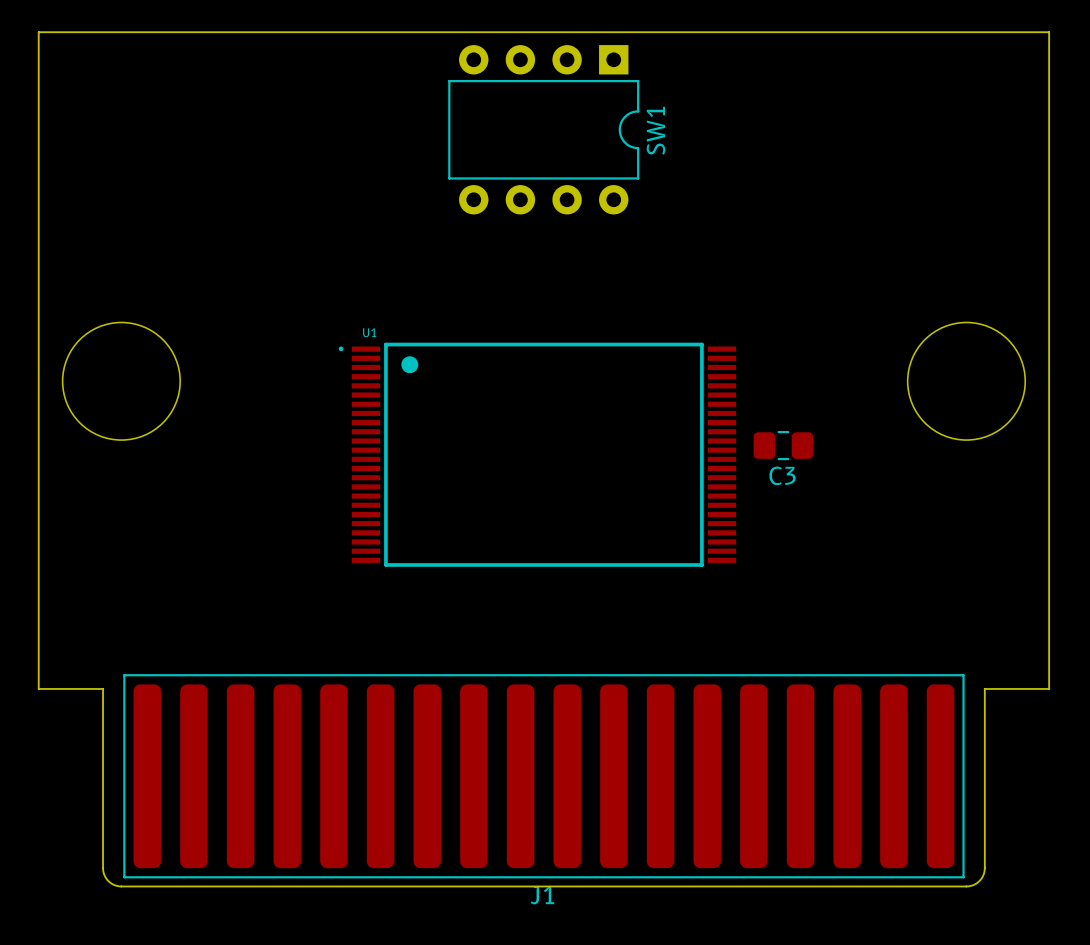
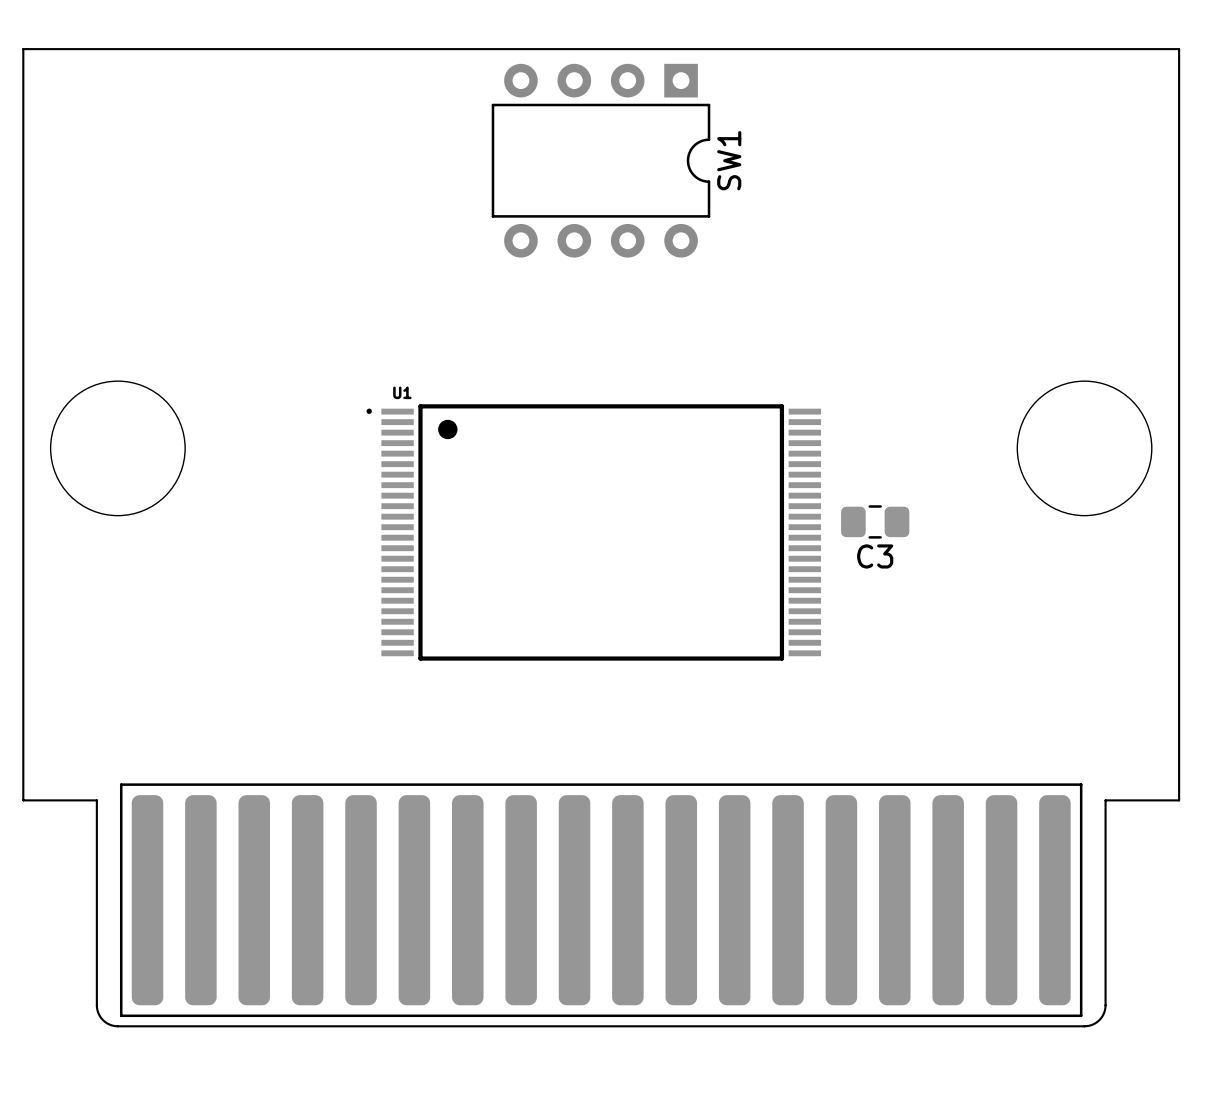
J1 name: J1 (542, 895) -> none

